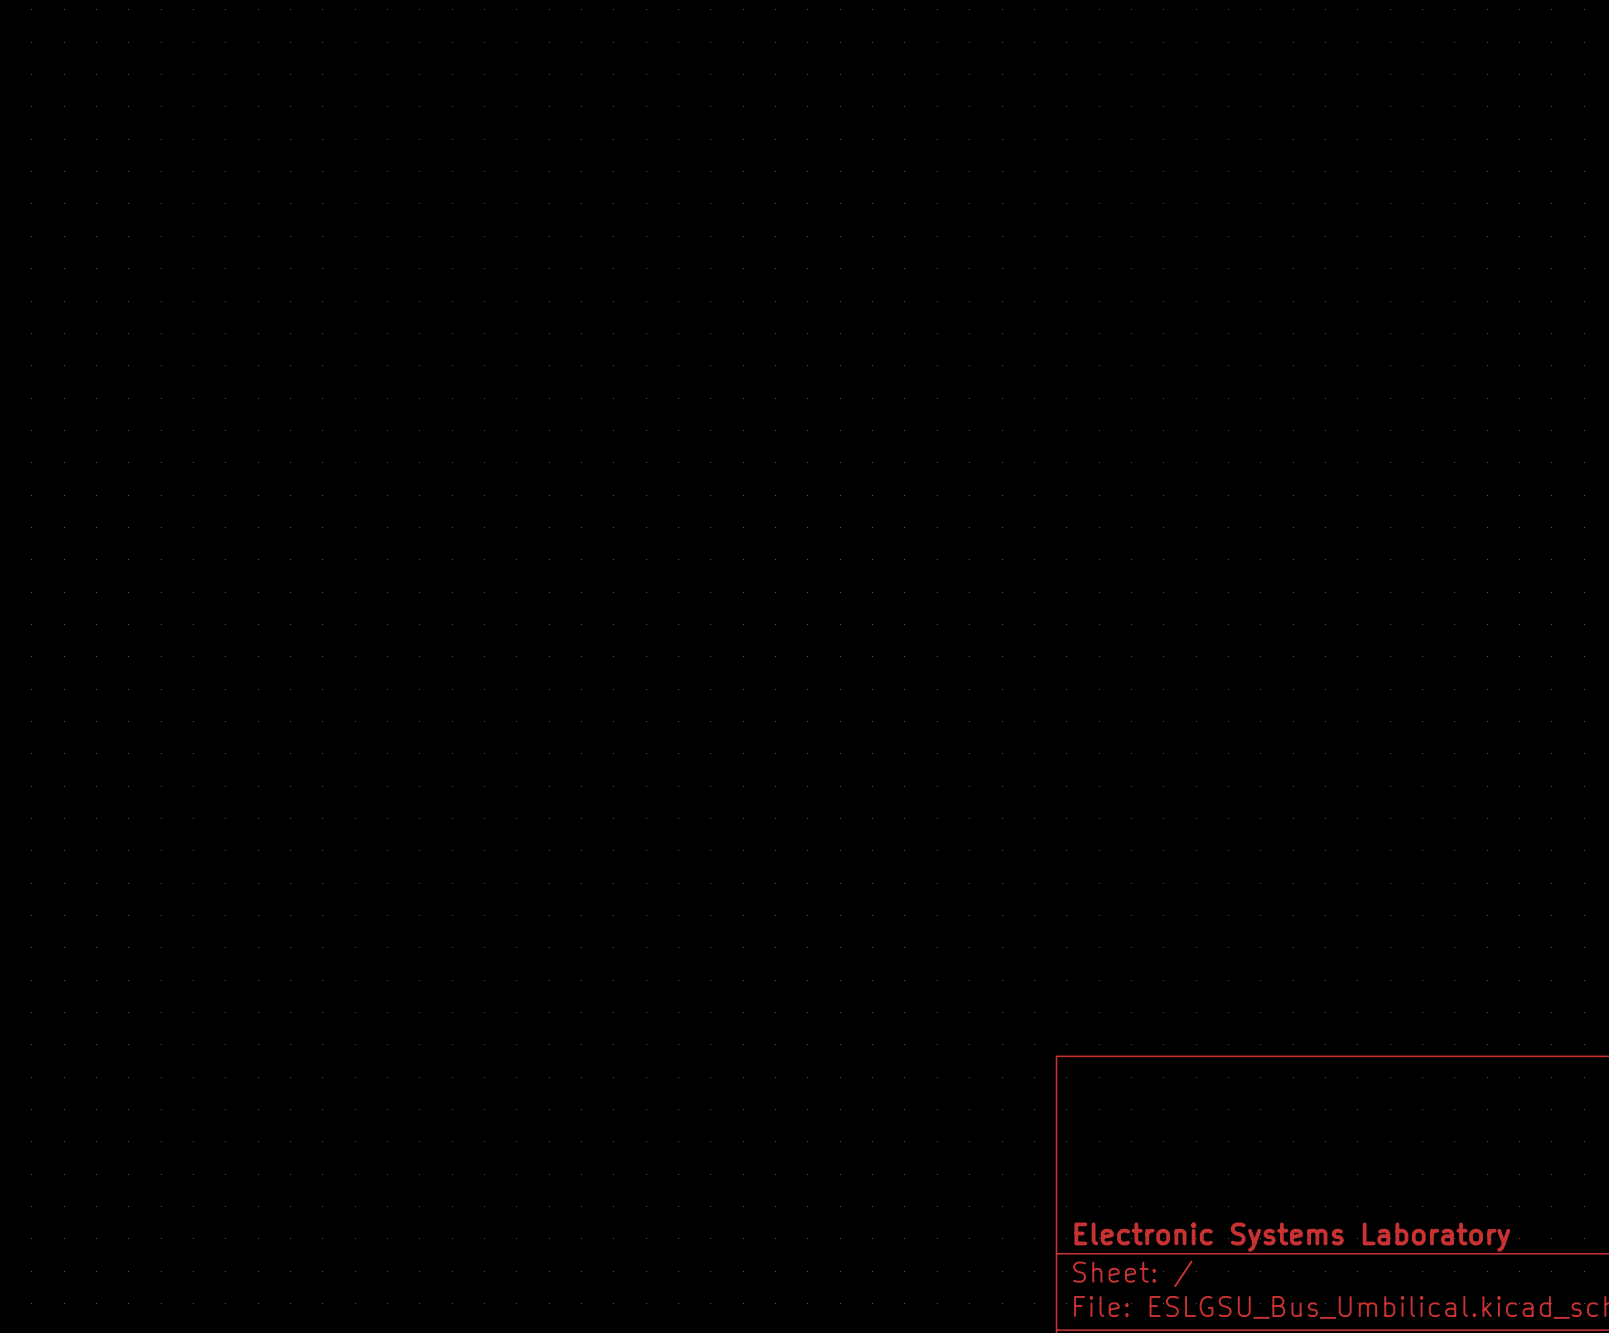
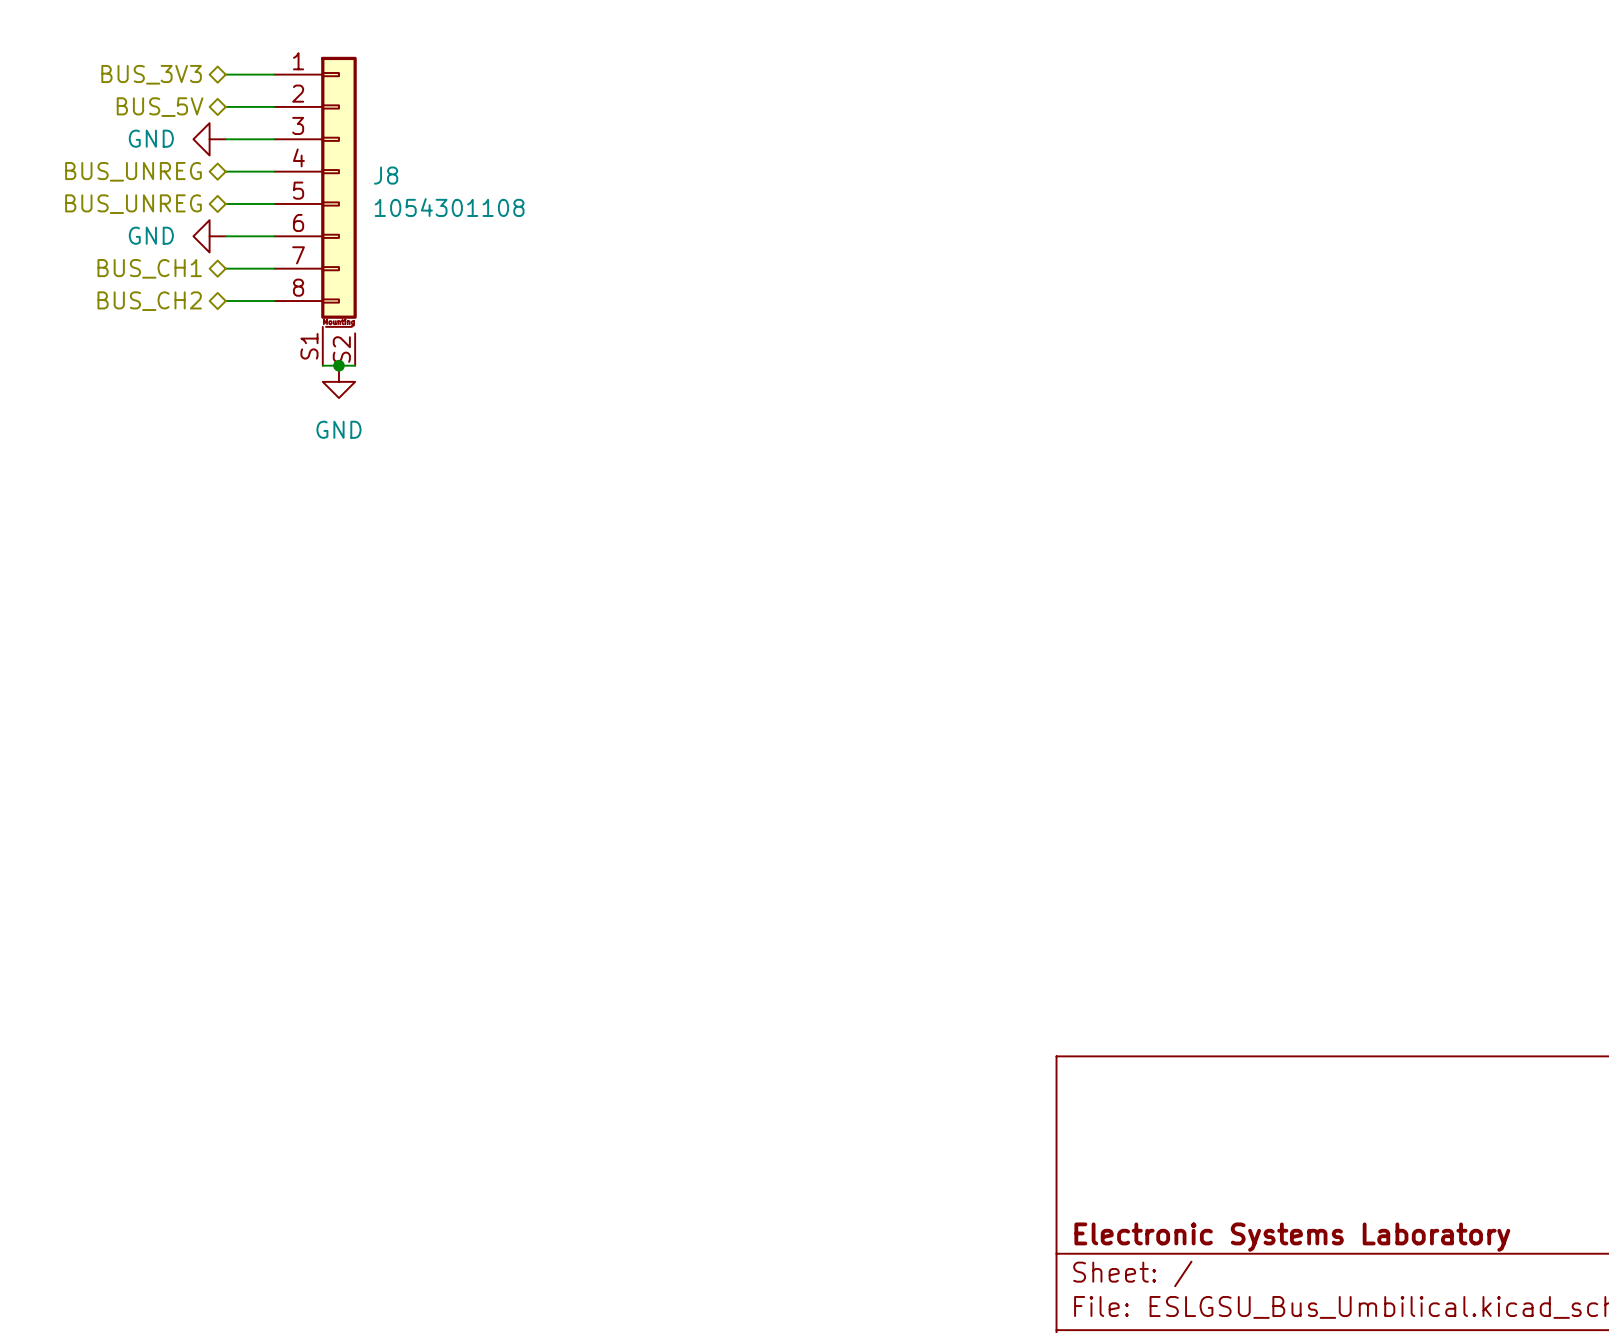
hierarchical label: none -> BUS_3V3 (151, 74)
wire: none -> (225, 74) (274, 74)
wire: none -> (225, 106) (274, 106)
hierarchical label: none -> BUS_5V (160, 107)
power symbol: none -> GND (209, 139)
wire: none -> (225, 139) (274, 139)
hierarchical label: none -> BUS_UNREG (133, 171)
wire: none -> (225, 171) (274, 171)
wire: none -> (225, 203) (274, 203)
hierarchical label: none -> BUS_UNREG (133, 204)
J8: none -> 1054301108 (315, 211)
power symbol: none -> GND (209, 236)
wire: none -> (225, 236) (274, 236)
hierarchical label: none -> BUS_CH1 (149, 268)
wire: none -> (225, 268) (274, 268)
hierarchical label: none -> BUS_CH2 (149, 301)
wire: none -> (225, 301) (274, 301)
wire: none -> (322, 365) (355, 365)
junction: none -> (338, 365)
power symbol: none -> GND (338, 381)

